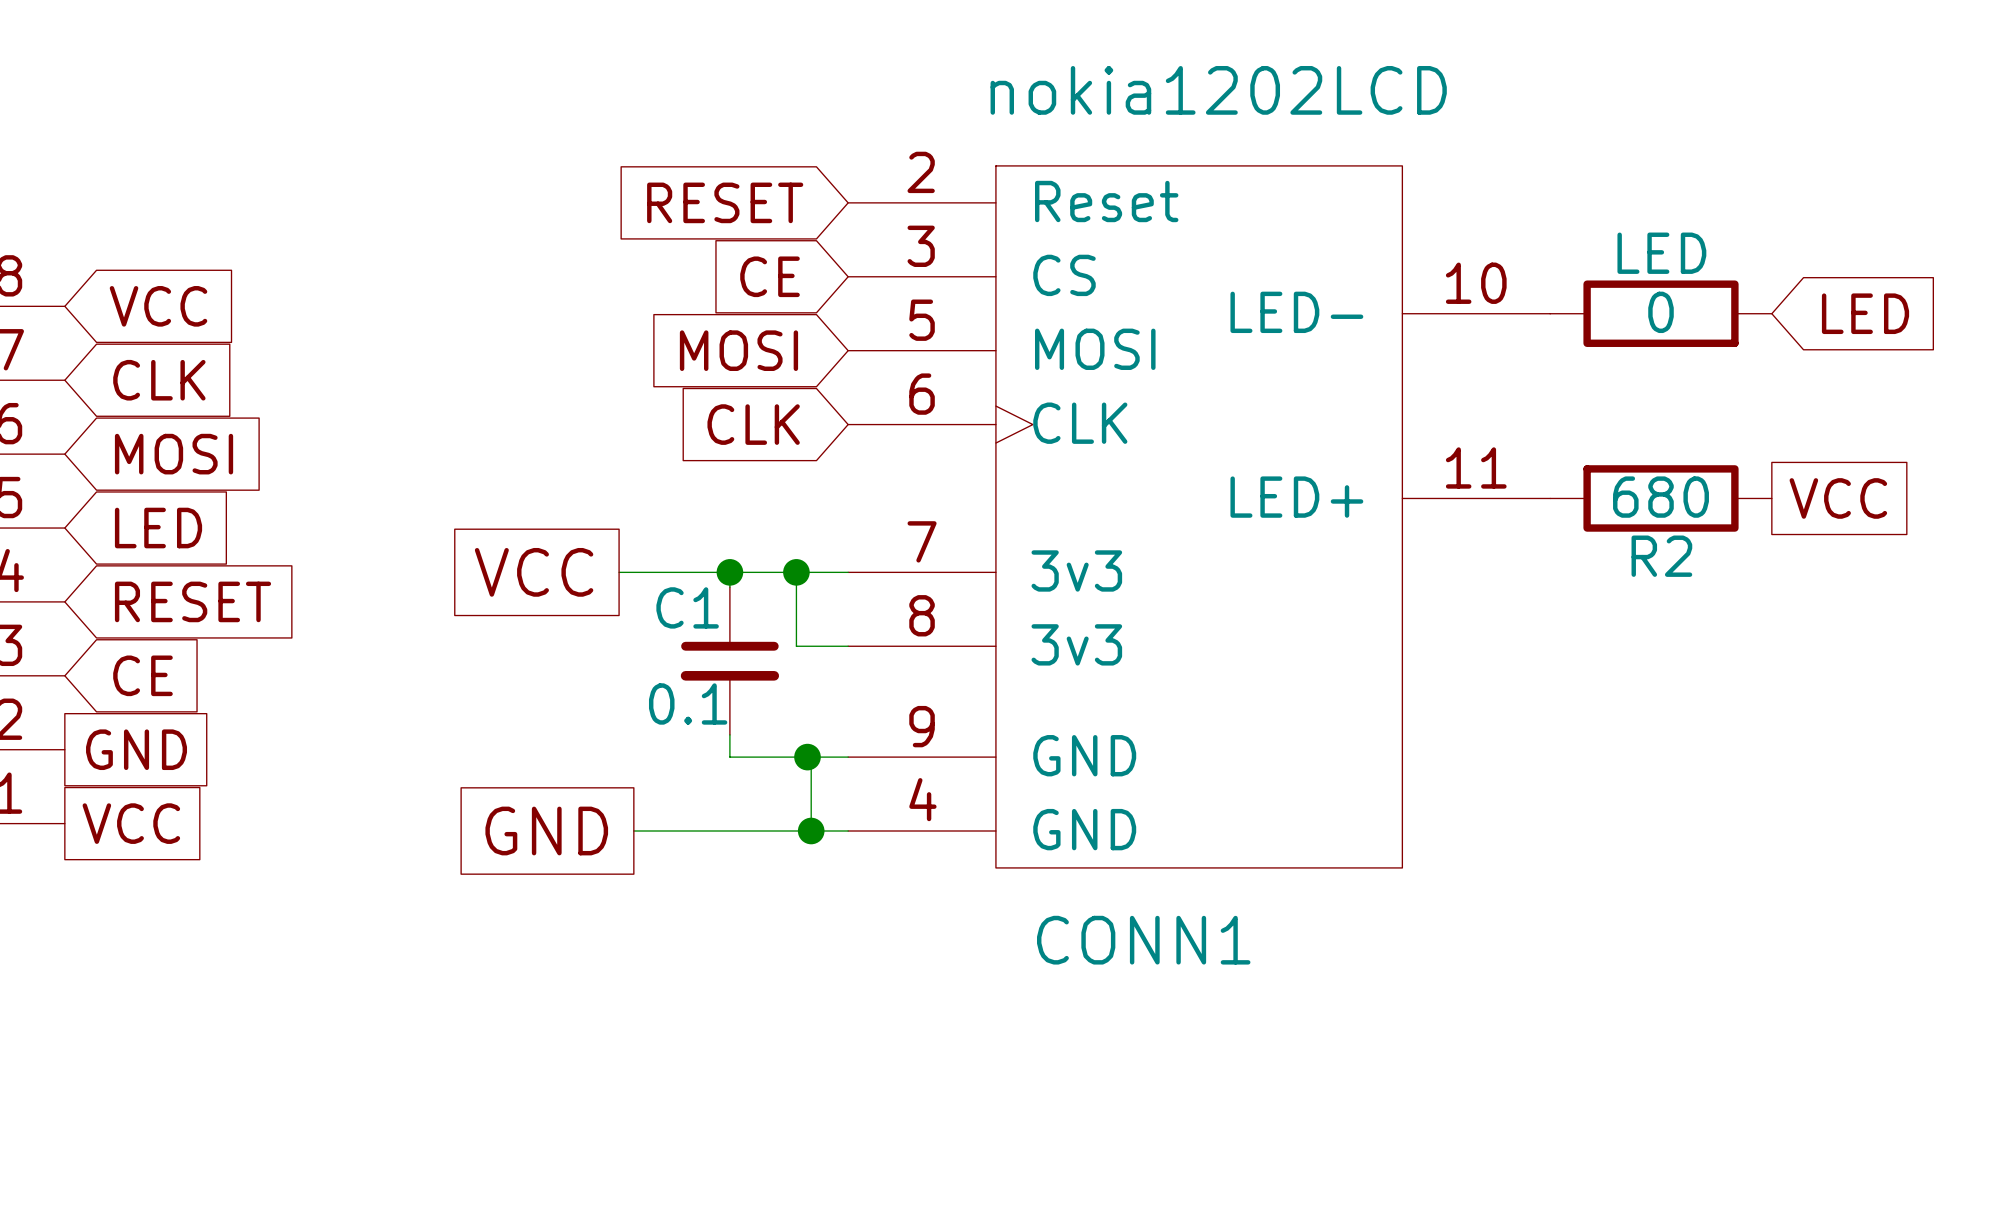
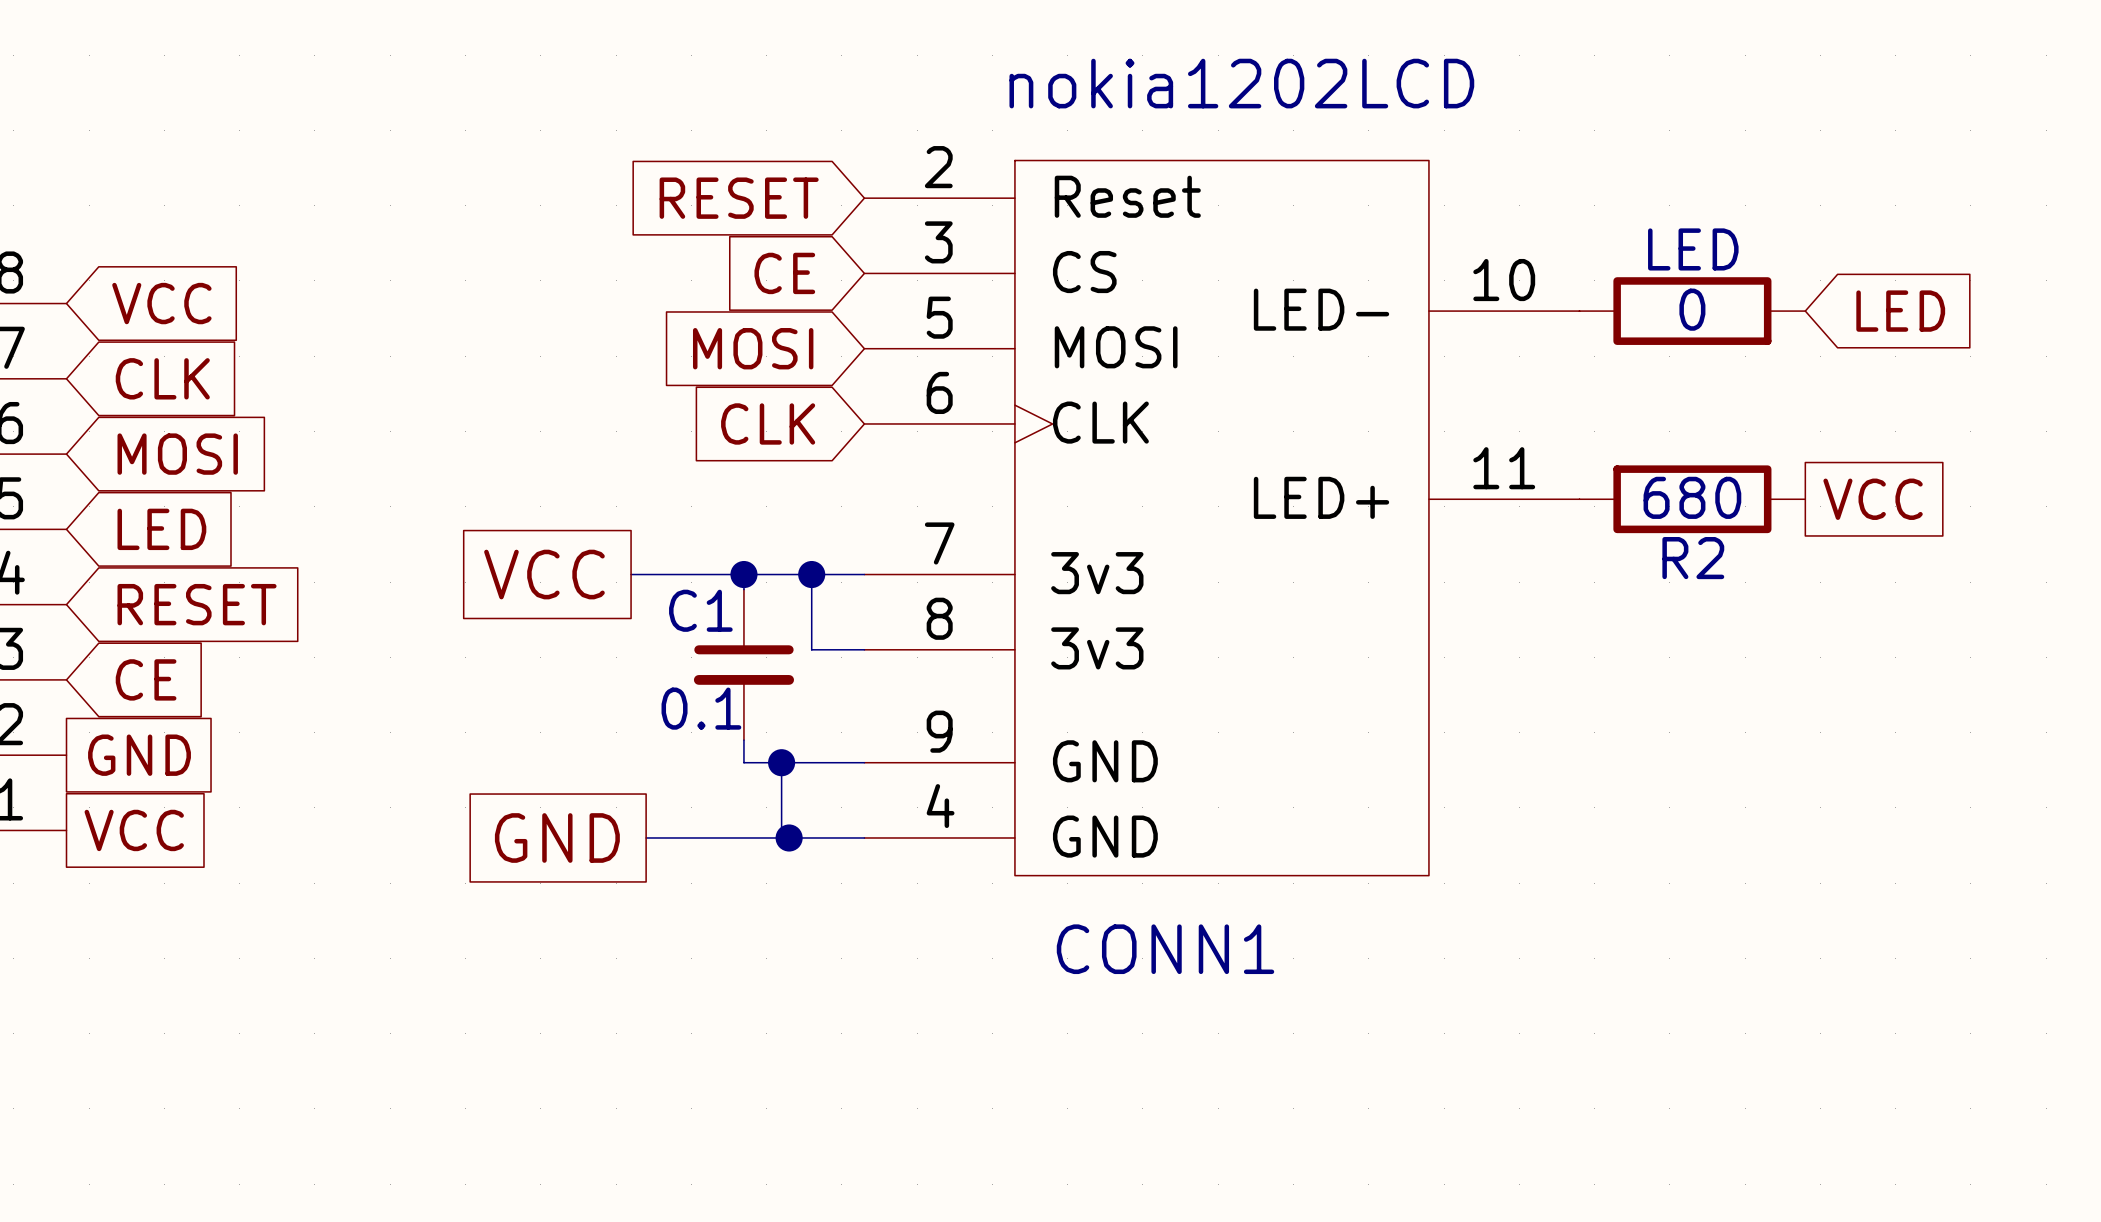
junction: none -> (781, 762)
junction: (807, 757) -> none
wire: (811, 757) (811, 830) -> (781, 762) (781, 837)
junction position: (811, 830) -> (789, 837)

